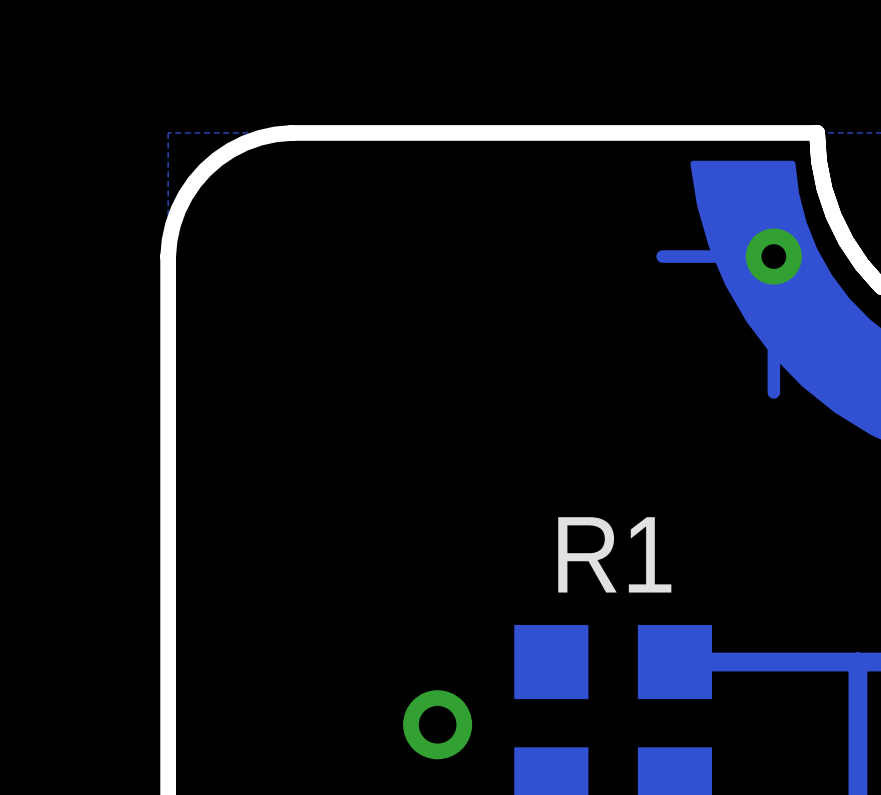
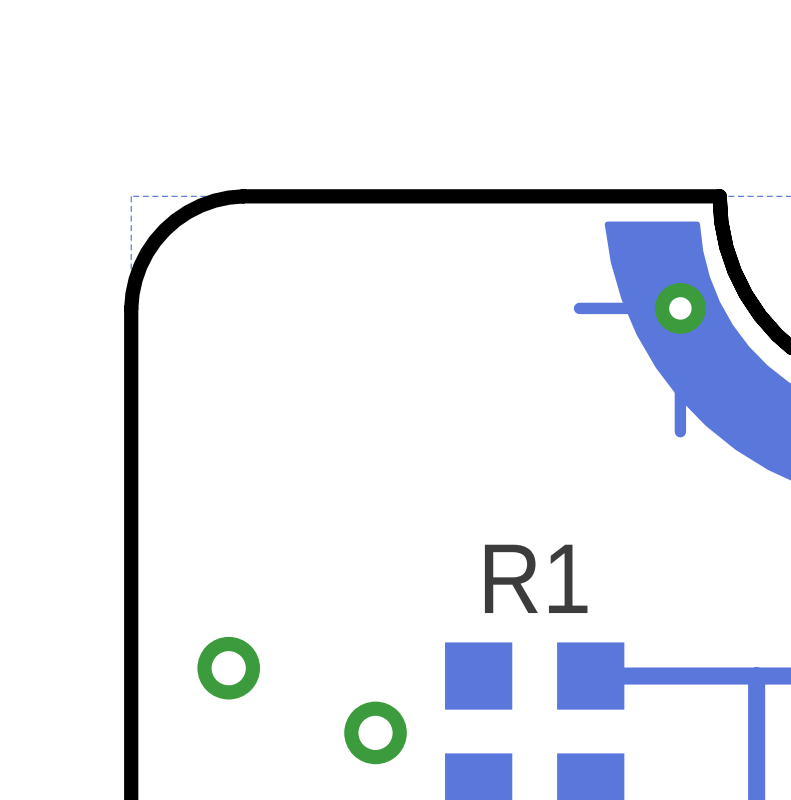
via: none -> (228, 668)

